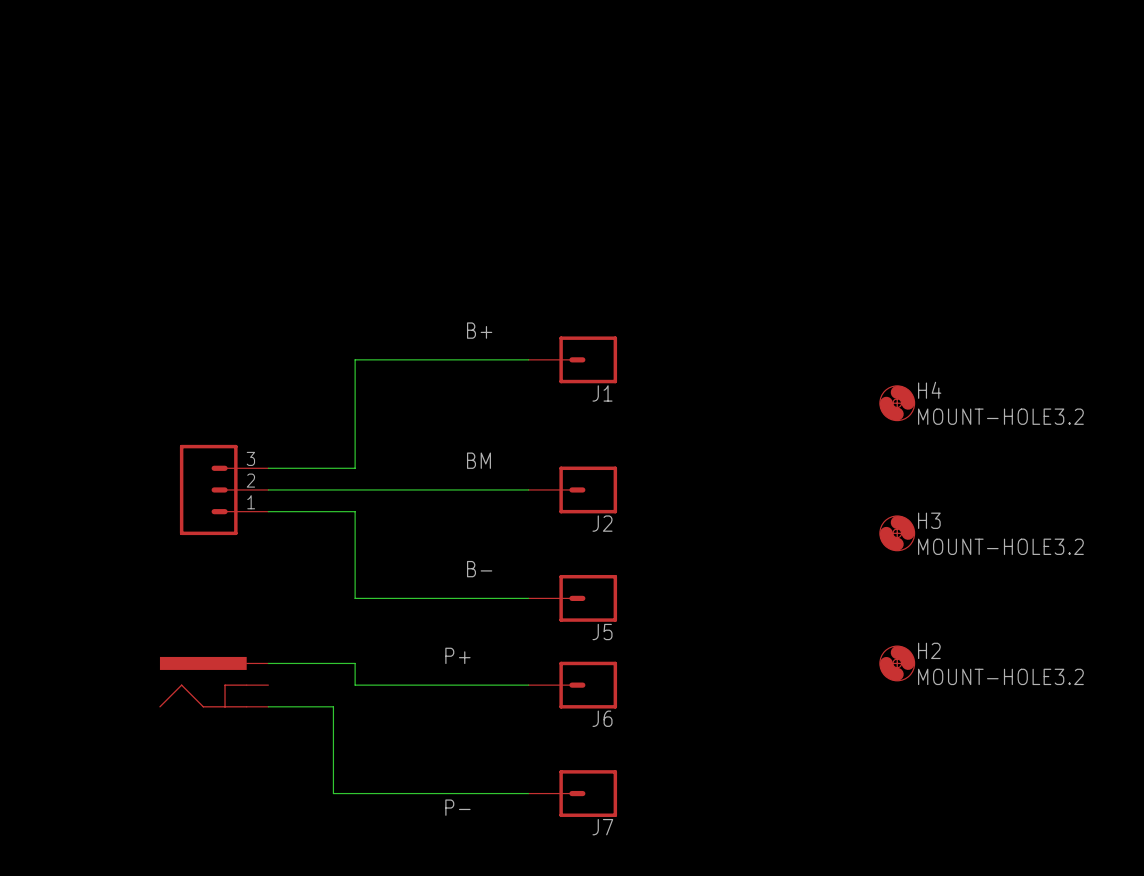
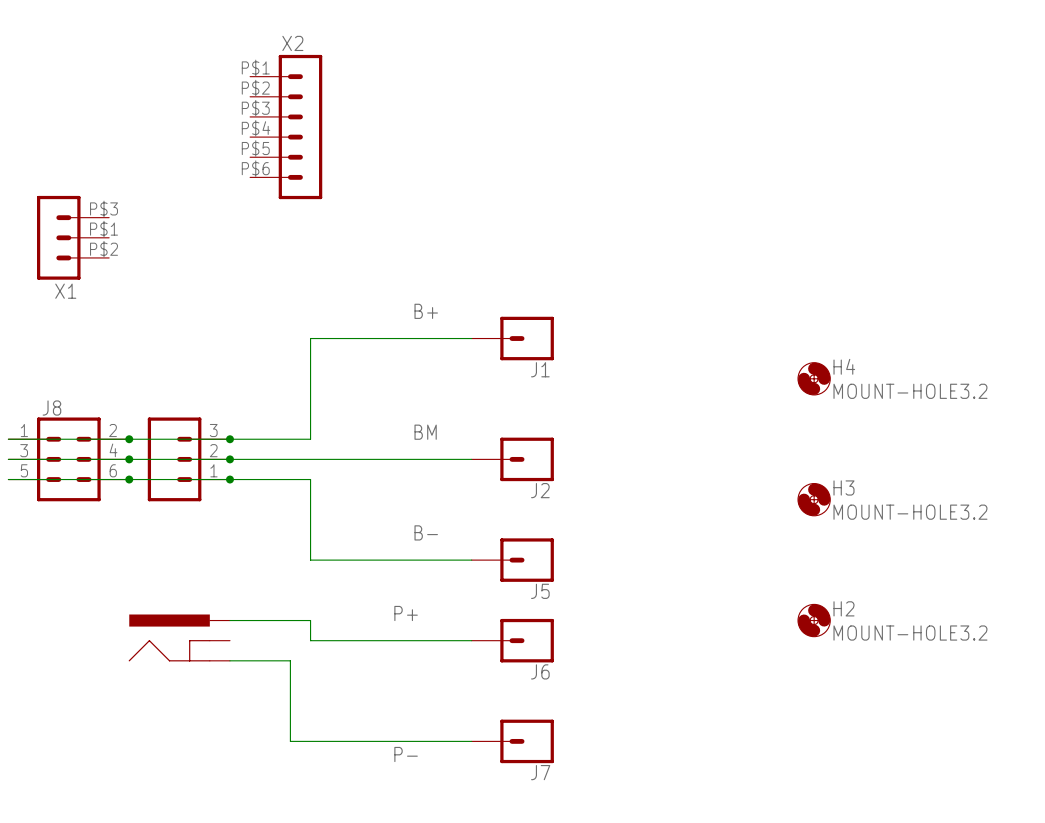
X2: none -> (286, 127)
X1: none -> (73, 237)
wire: none -> (8, 439) (229, 439)
junction: none -> (129, 439)
junction: none -> (229, 439)
wire: none -> (8, 459) (229, 459)
J8: none -> (68, 459)
junction: none -> (129, 459)
junction: none -> (229, 459)
wire: none -> (8, 479) (229, 479)
junction: none -> (129, 479)
junction: none -> (229, 479)

